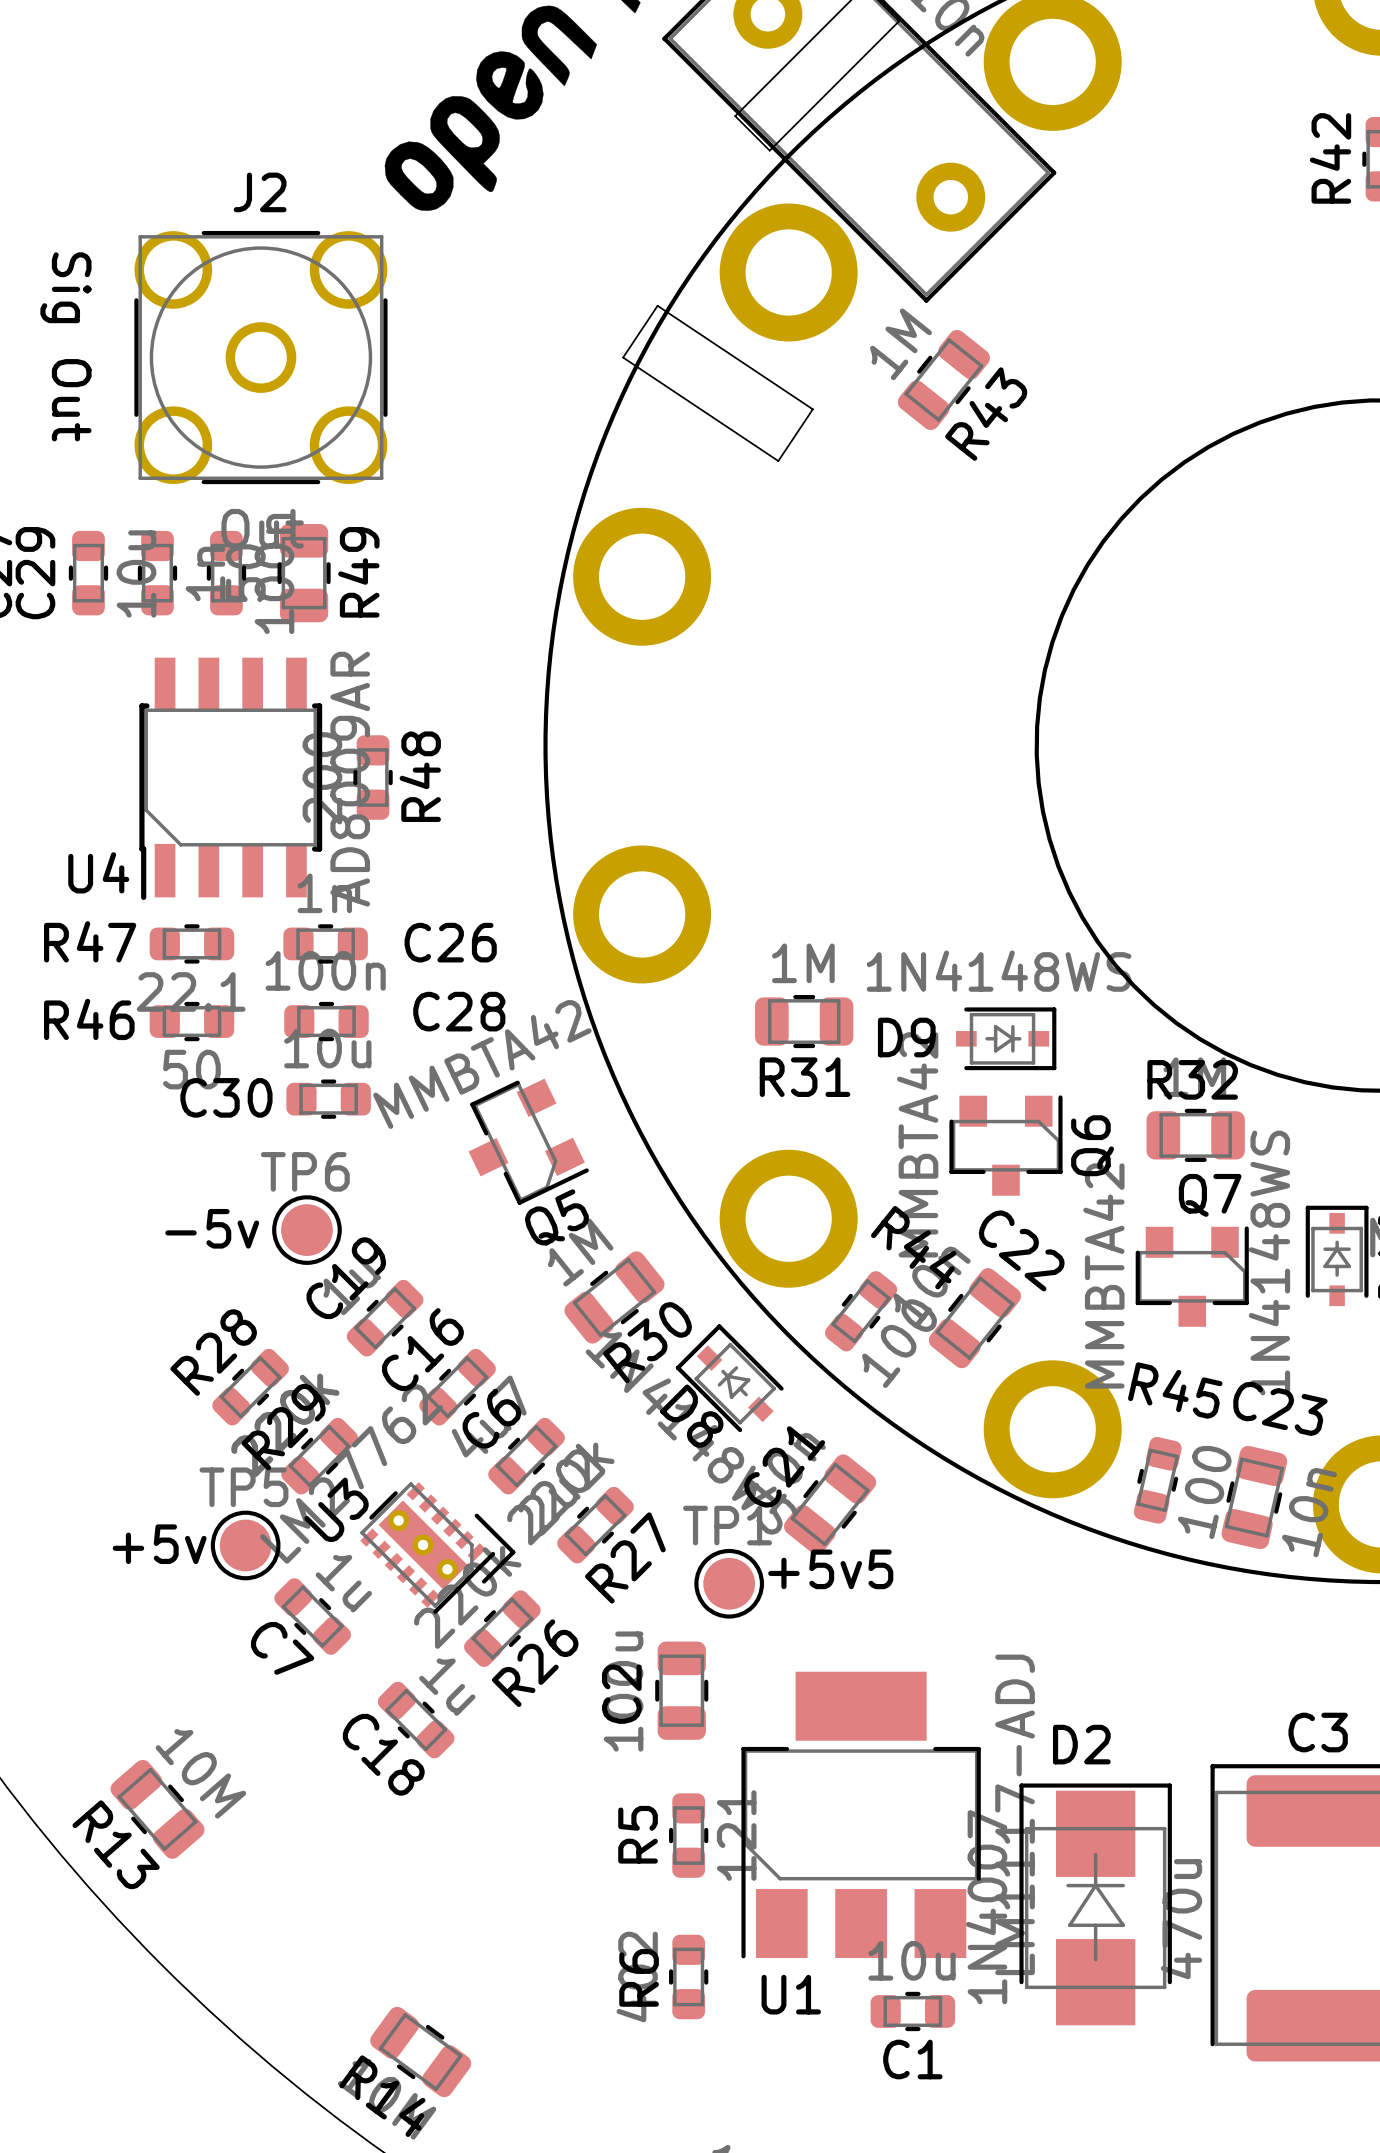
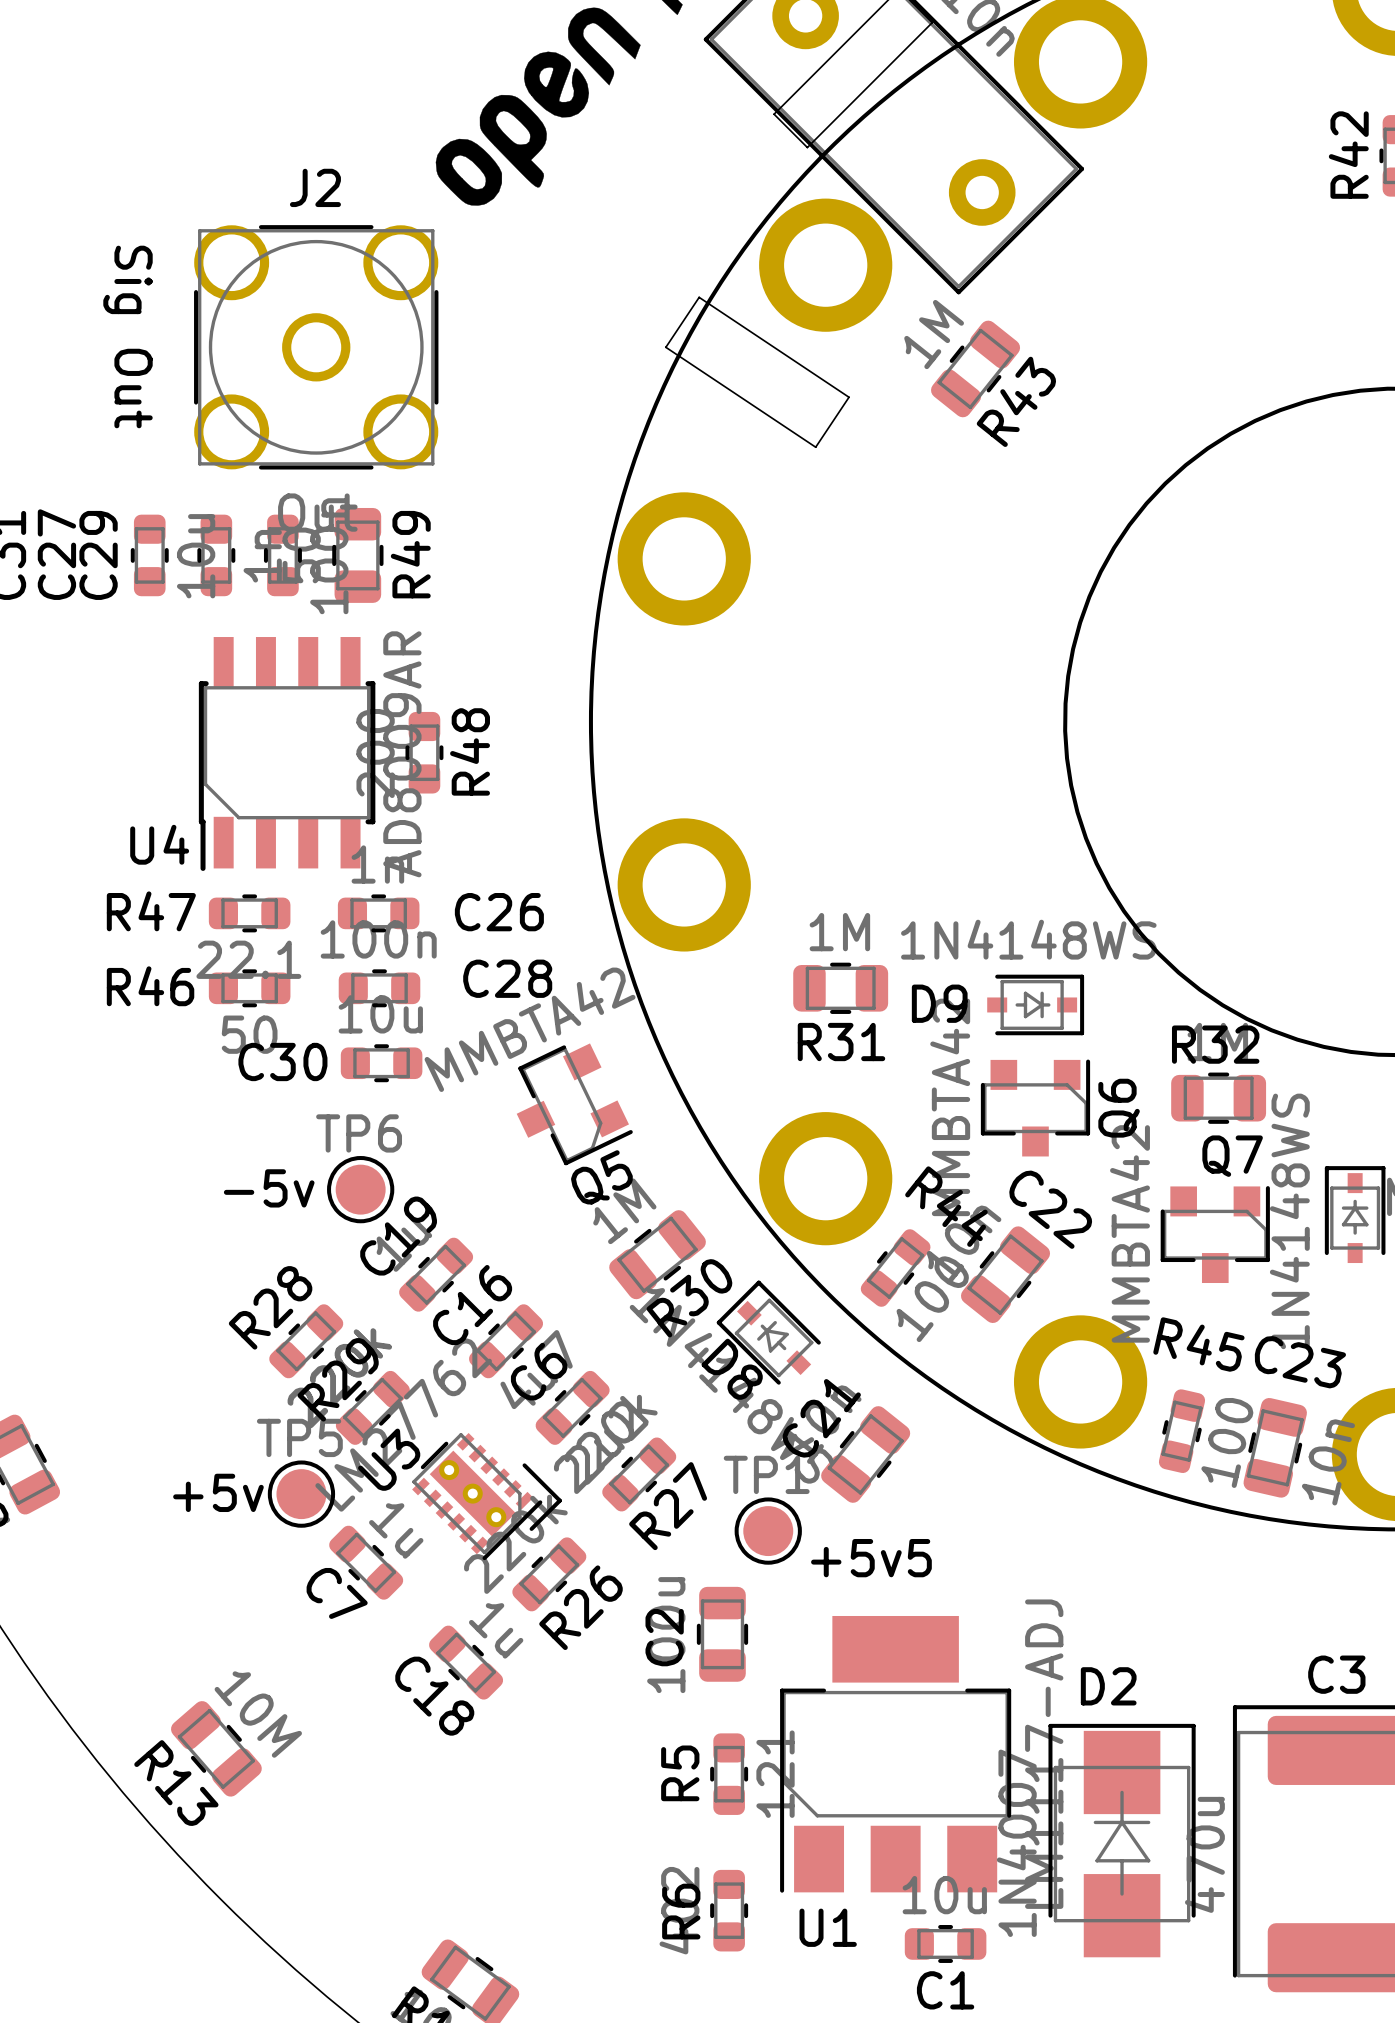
TP1 value position: +5v5 (830, 1569) -> +5v5 (871, 1558)

